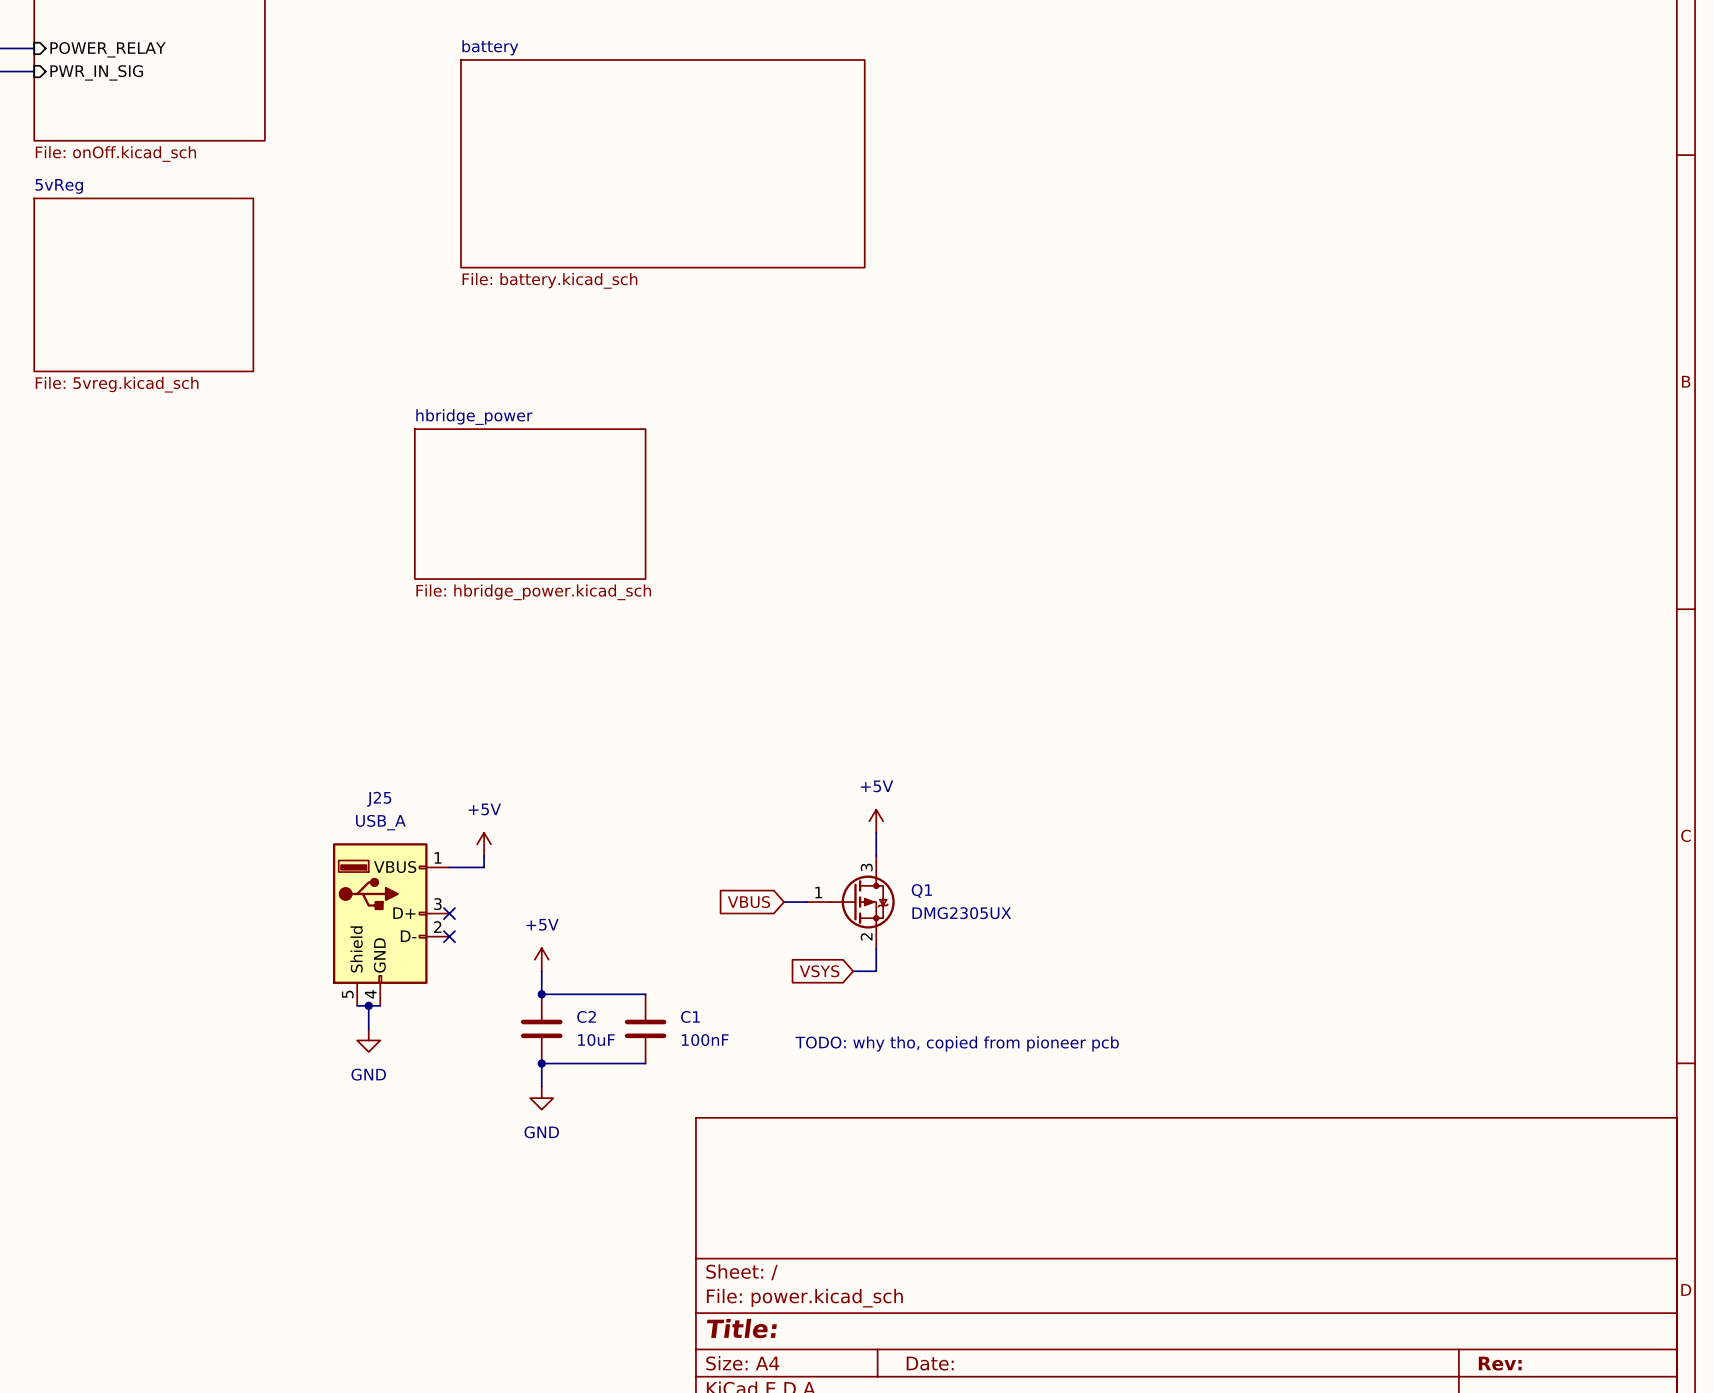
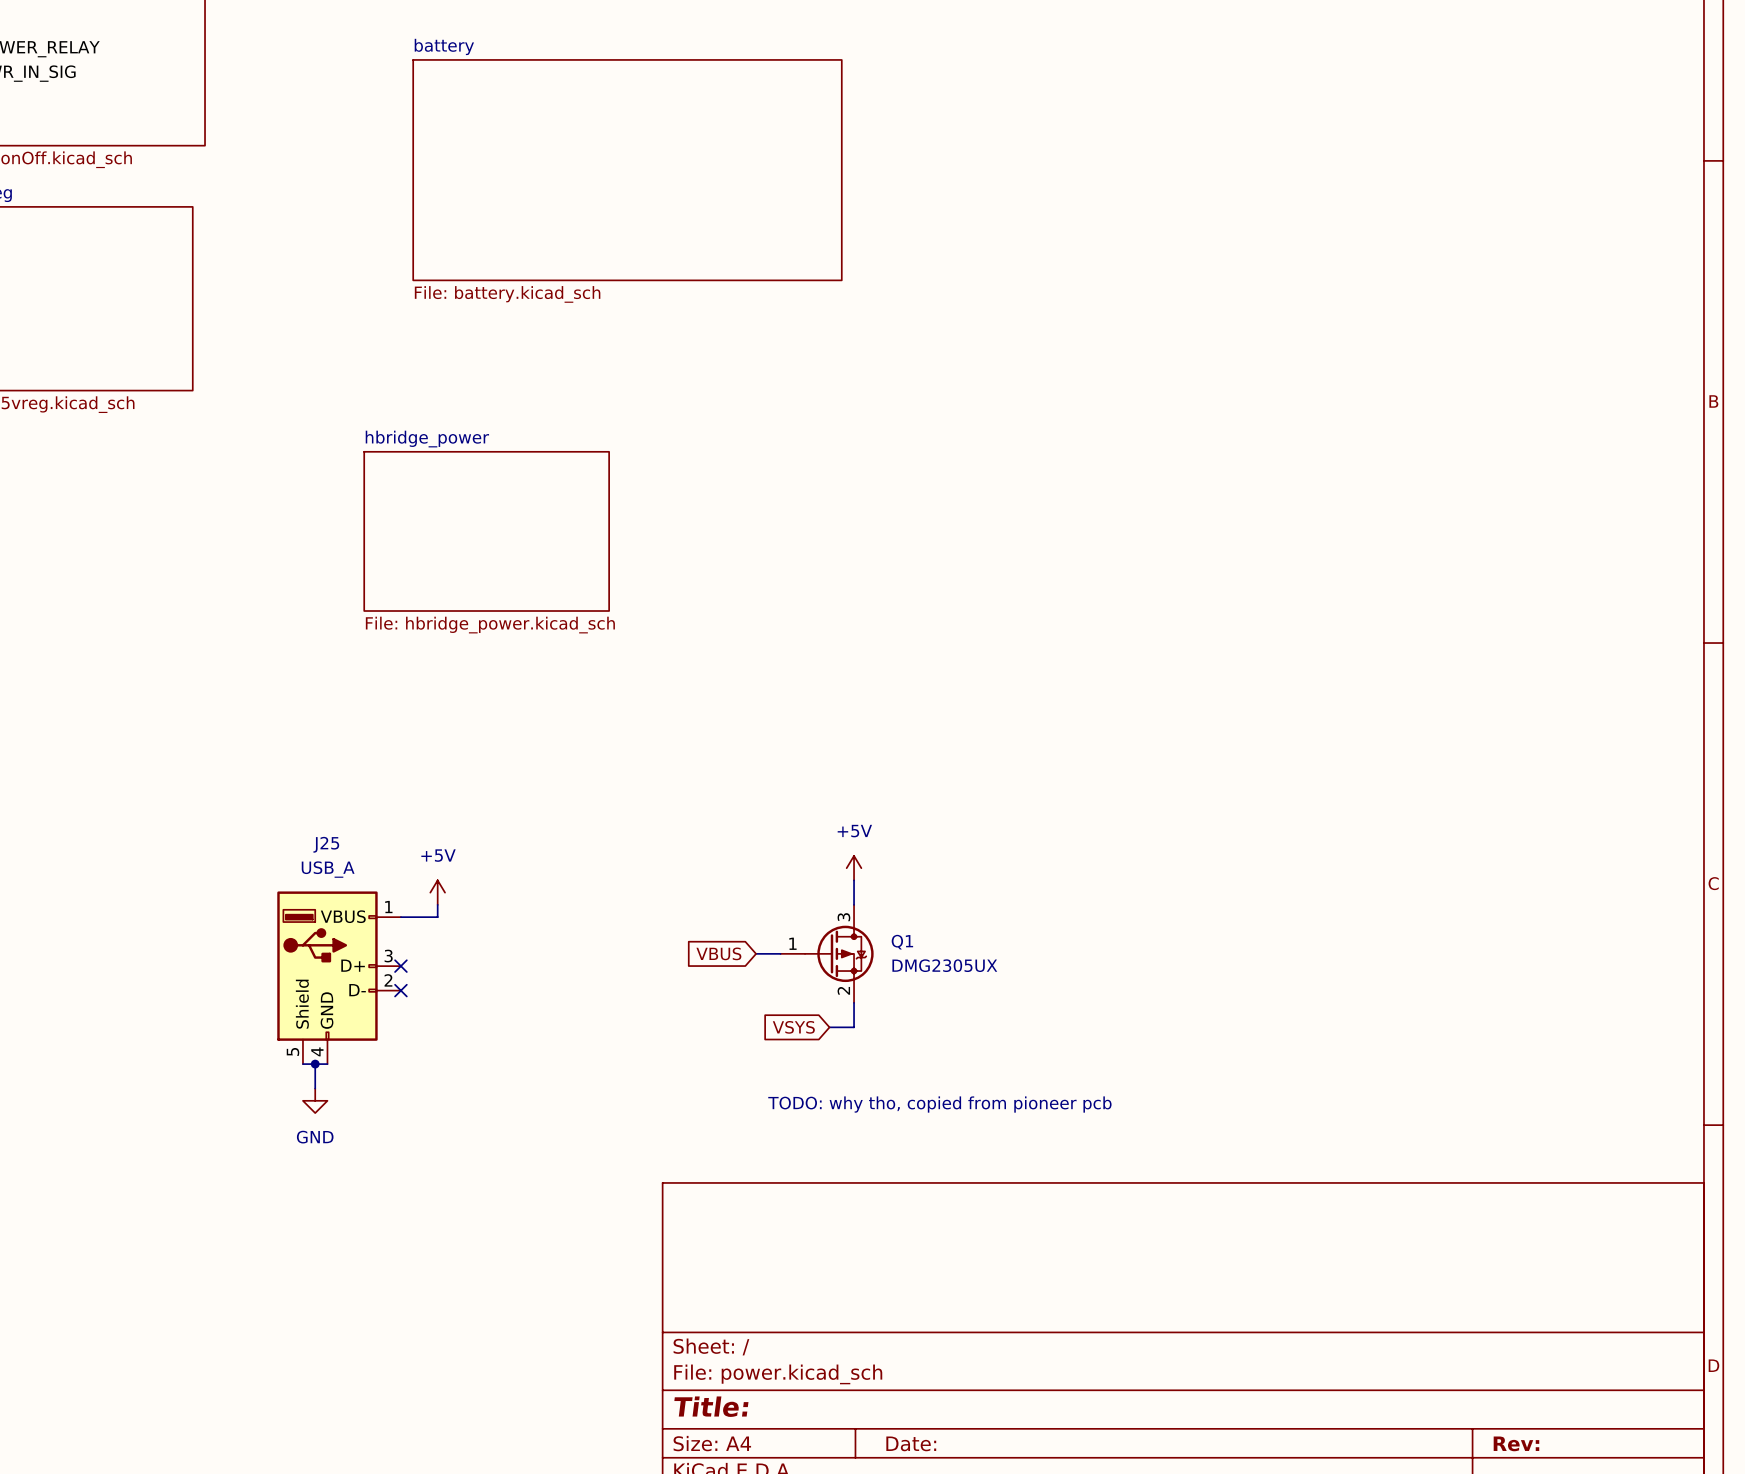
power symbol: +5V (541, 959) -> none
wire: (541, 971) (541, 994) (645, 994) -> none
junction: (541, 994) -> none
C2: 10uF (541, 1028) -> none
C1: 100nF (645, 1028) -> none
junction: (541, 1063) -> none
wire: (645, 1063) (541, 1063) (541, 1086) -> none
power symbol: GND (541, 1098) -> none

